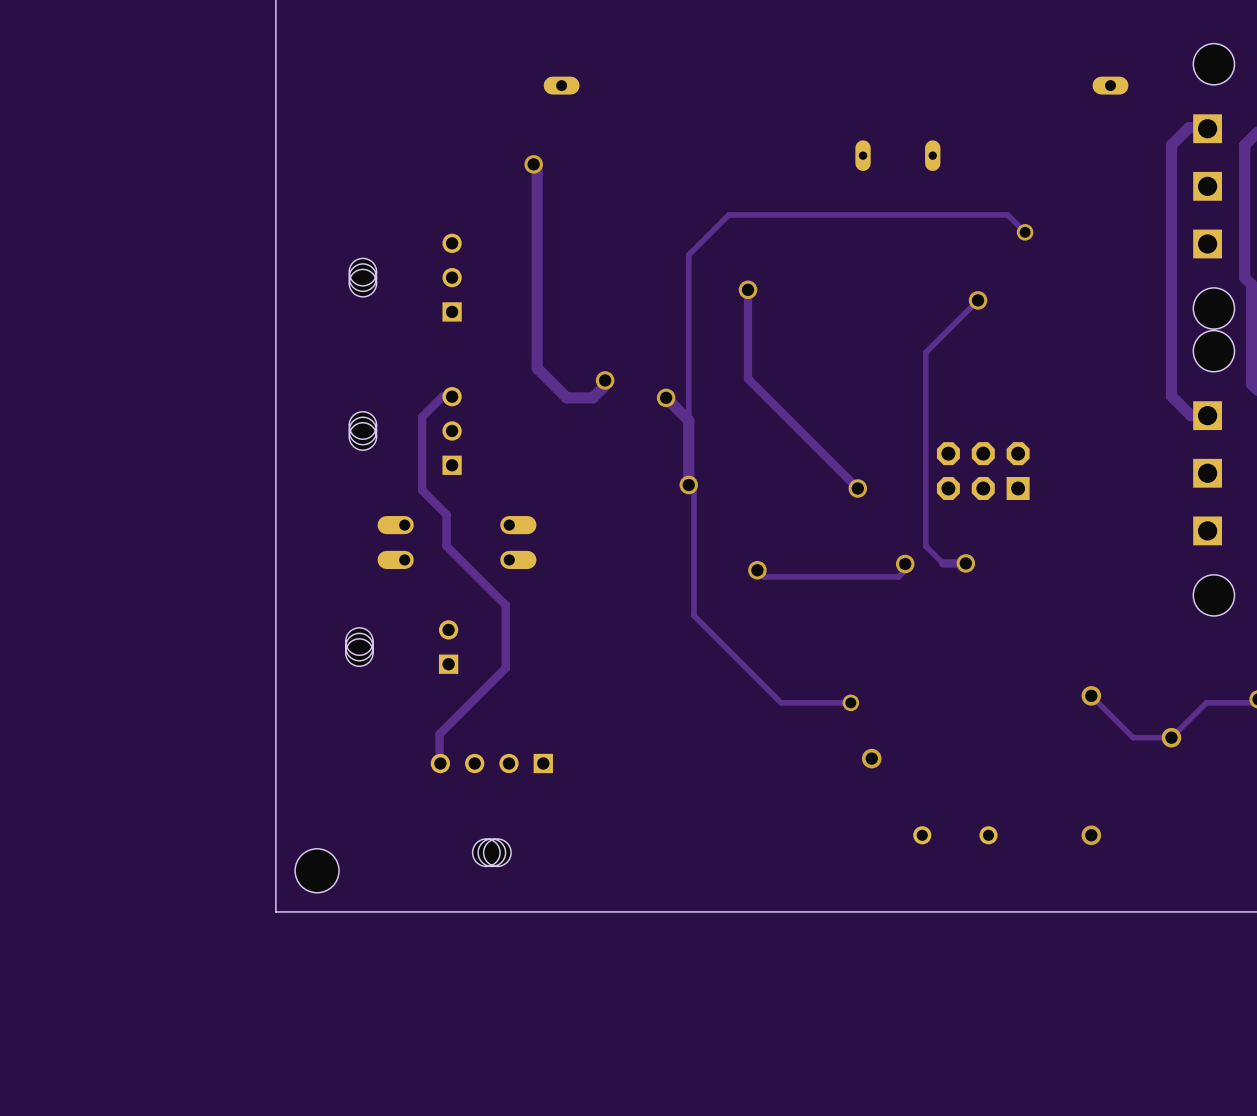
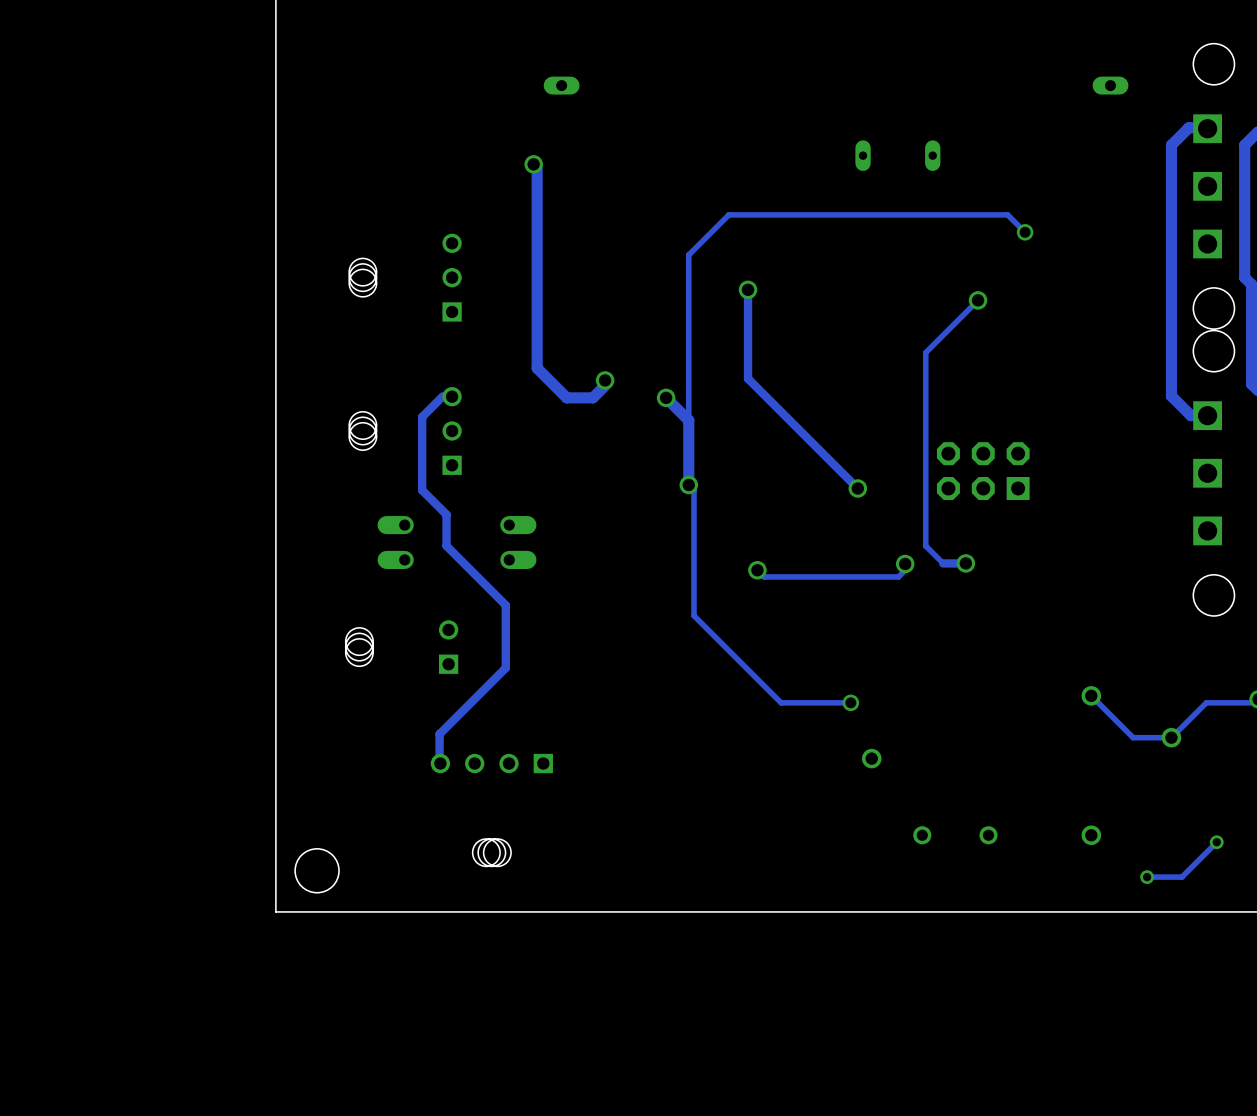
track: none -> (1216, 842) (1181, 877) (1147, 877)
via: none -> (1216, 842)
via: none -> (1147, 877)

